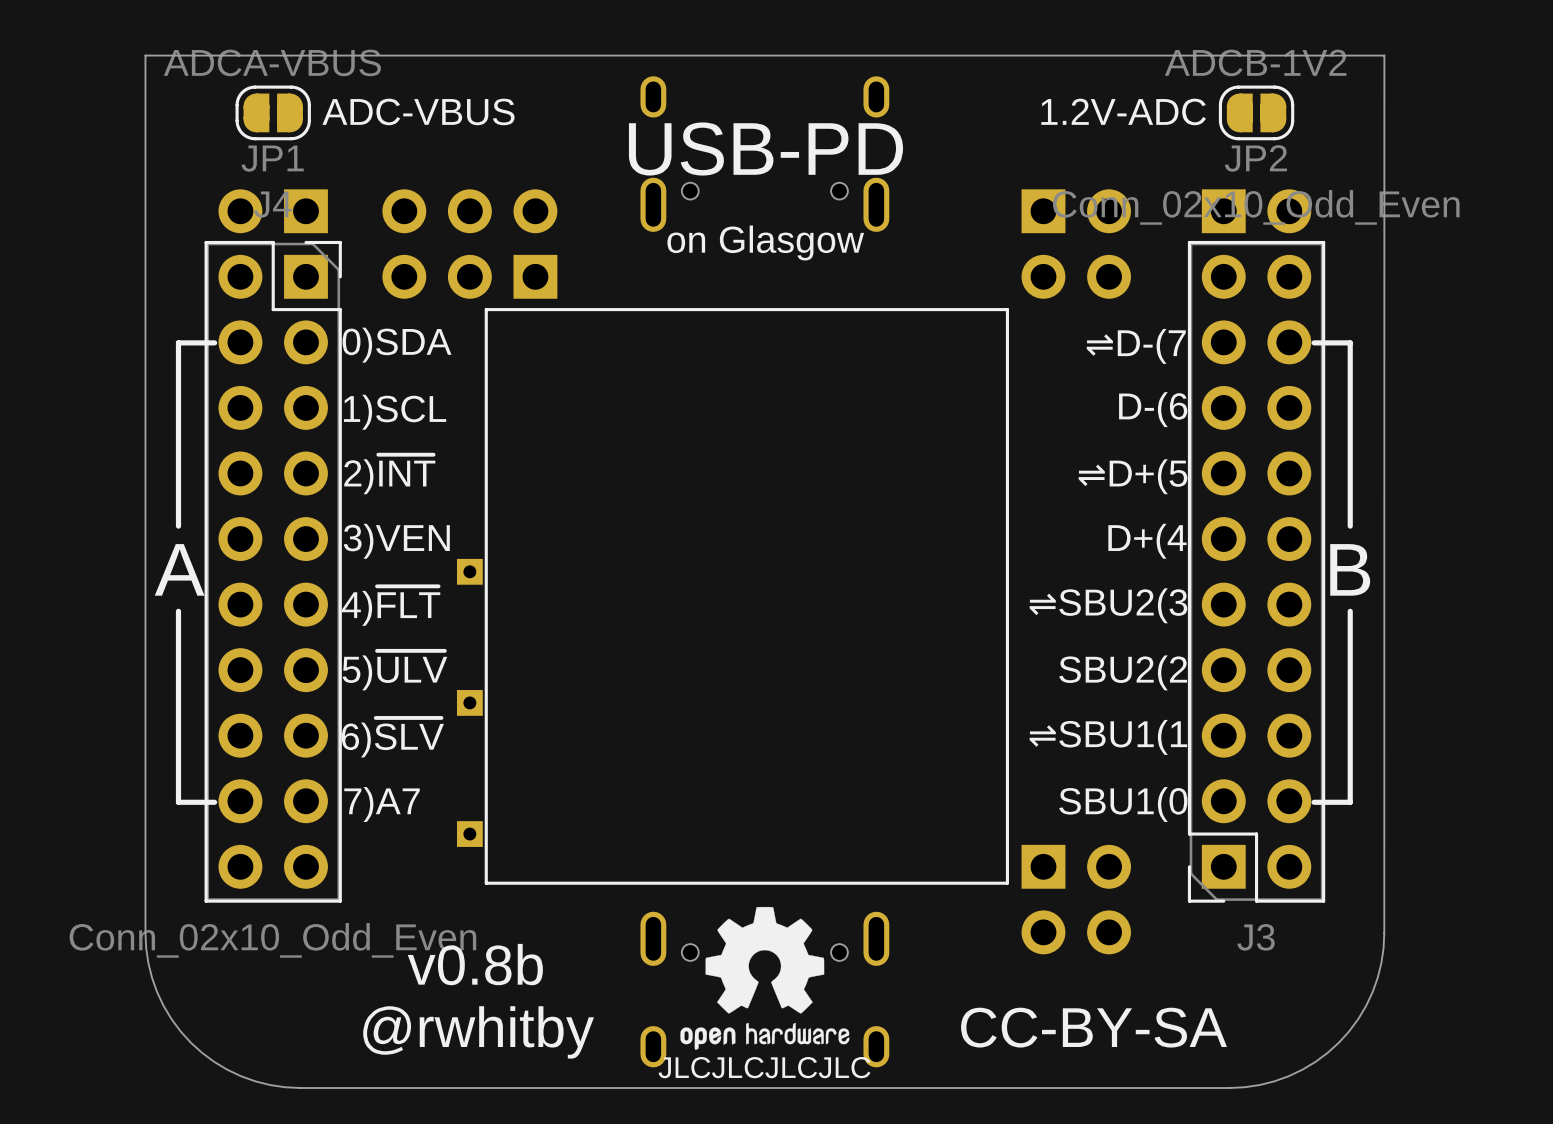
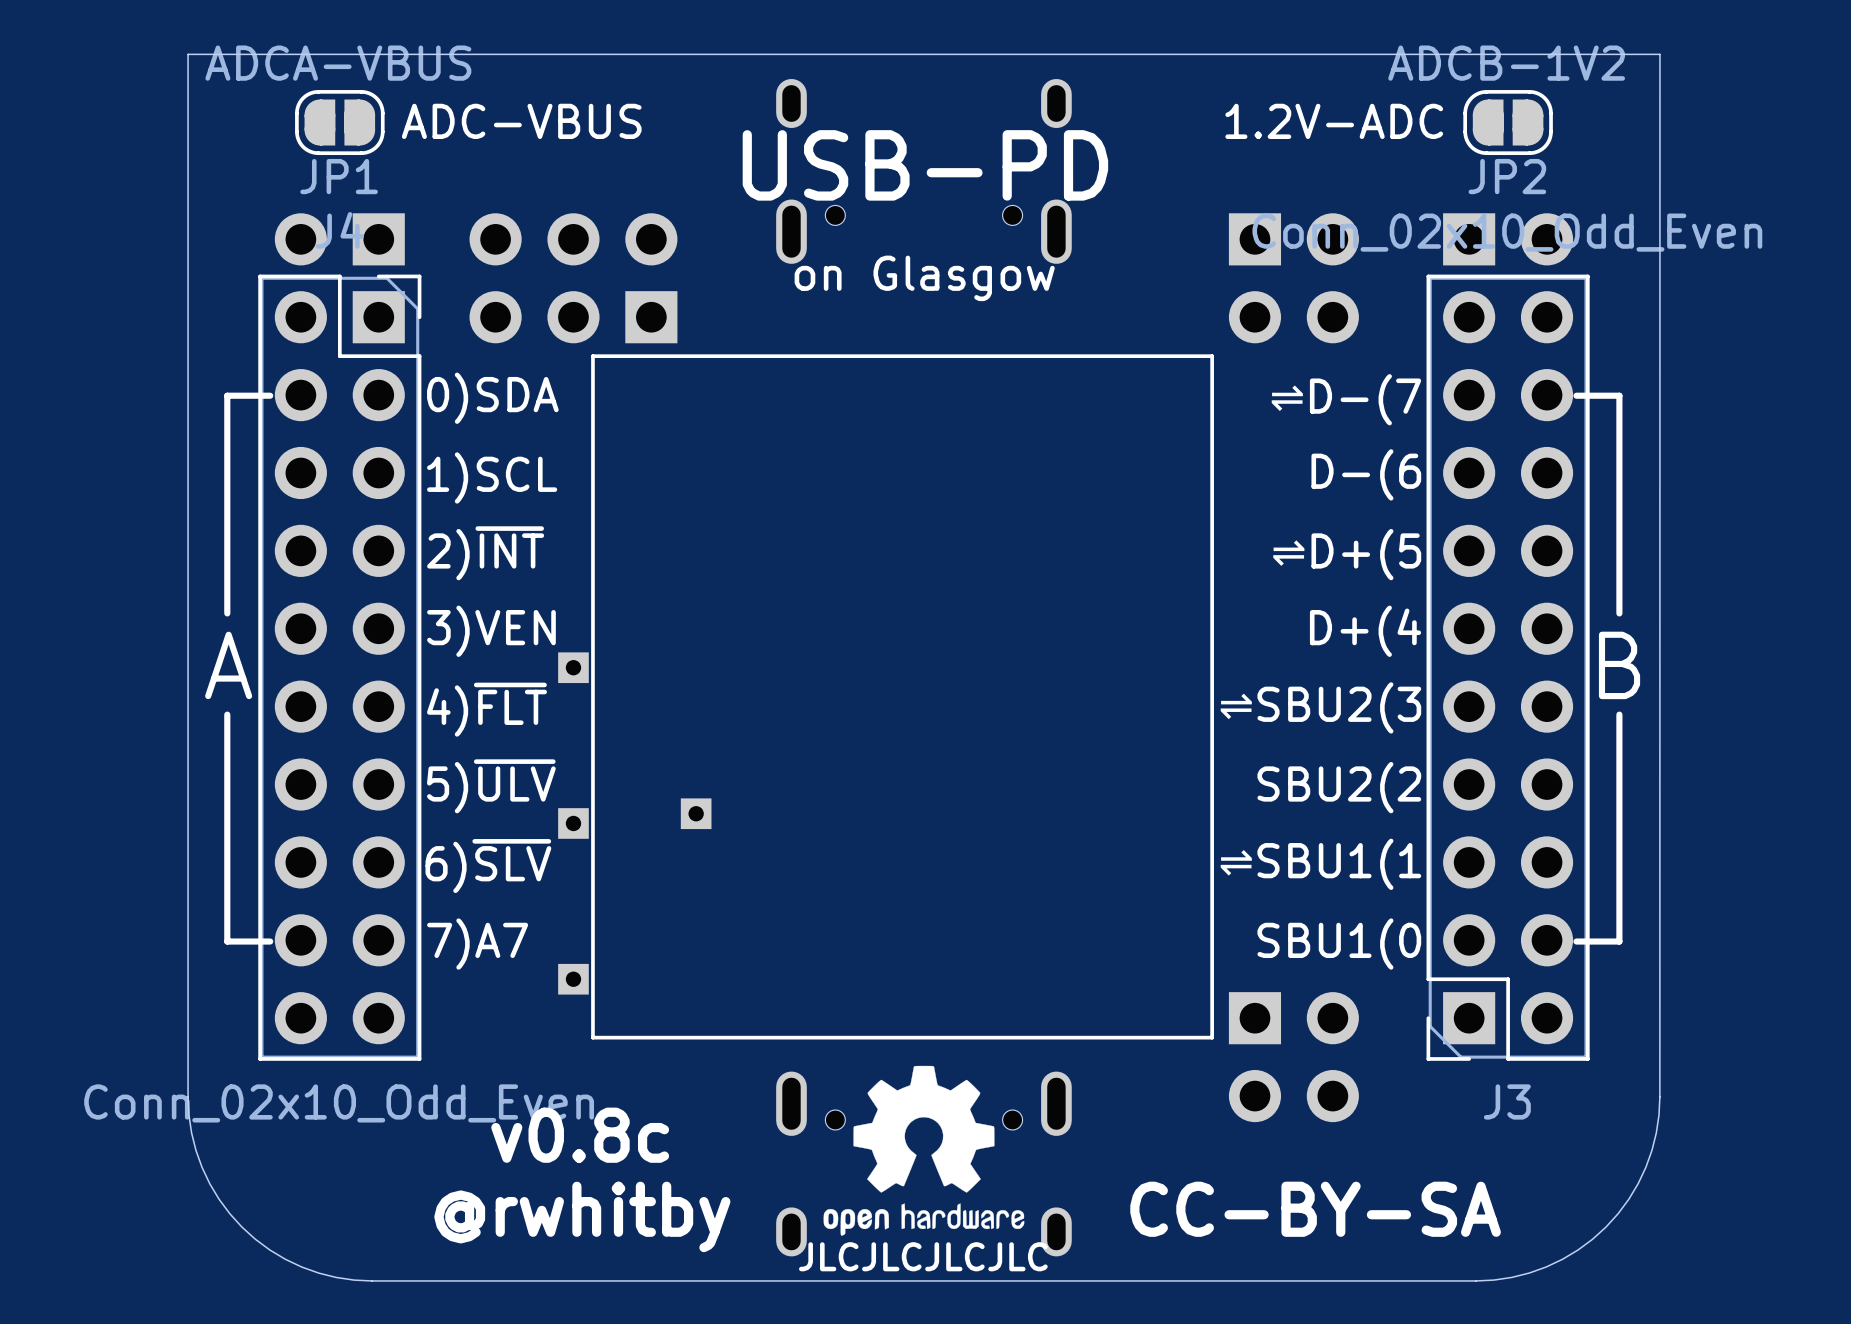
part: none -> (696, 813)
text: v0.8b (475, 964) -> v0.8c (580, 1135)

